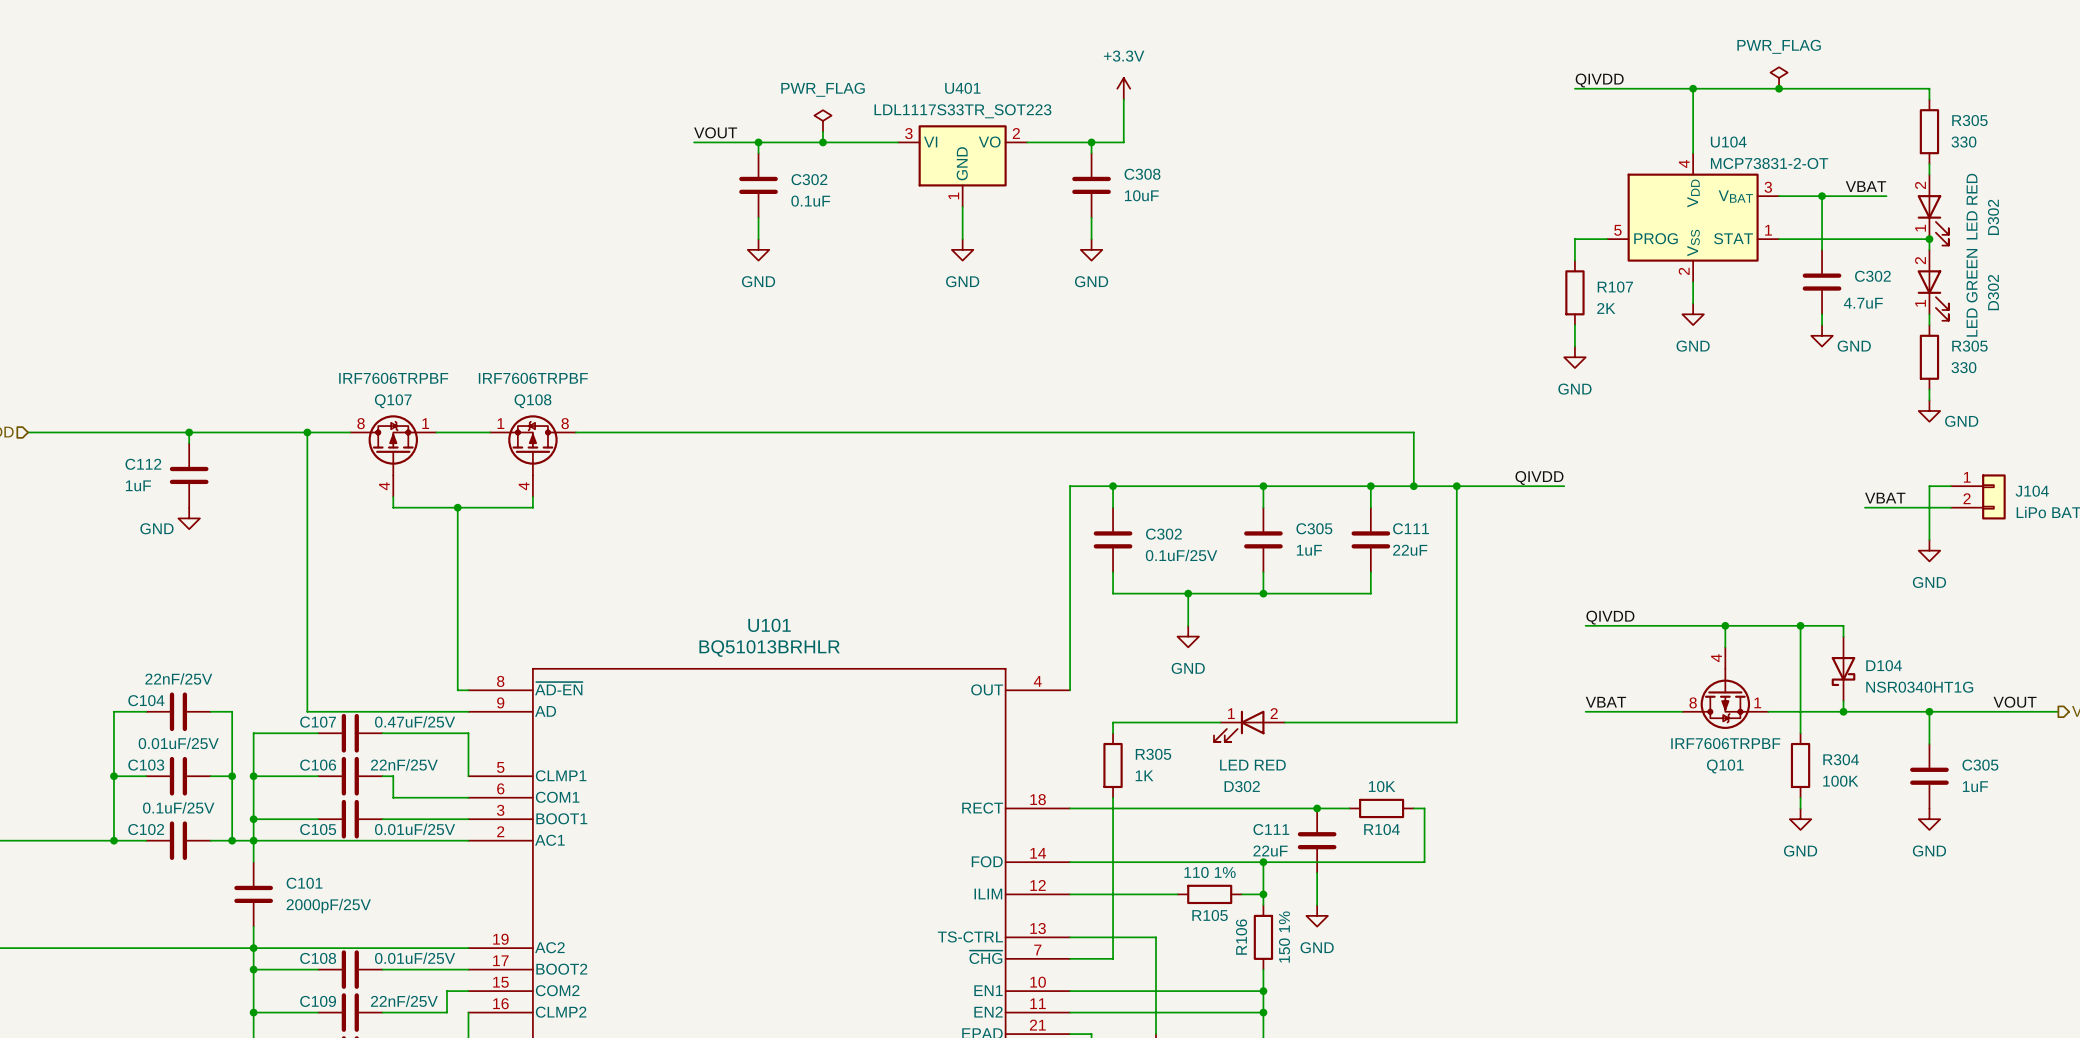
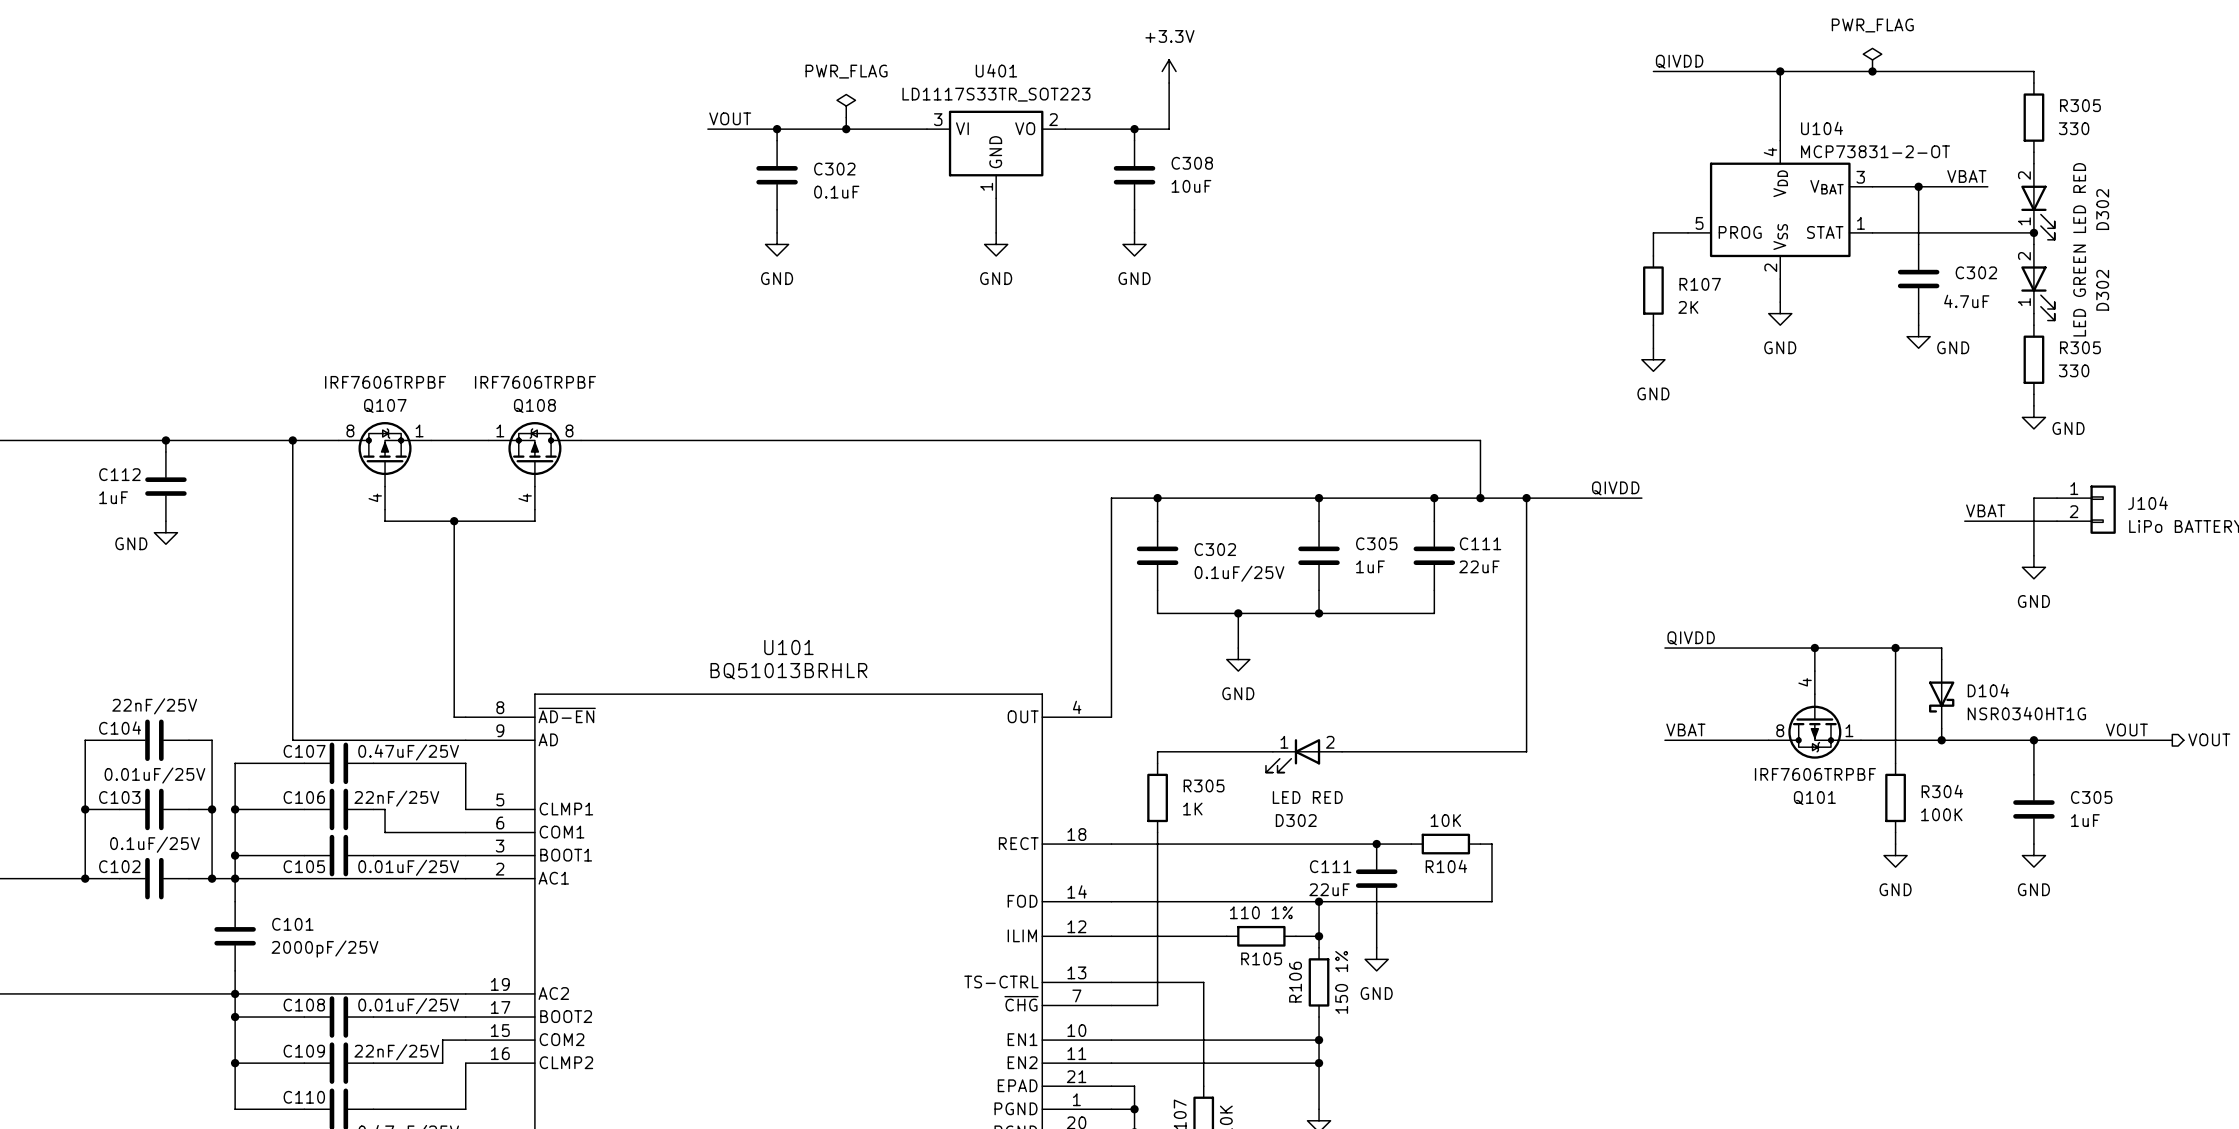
U401 value: LDL1117S33TR_SOT223 (962, 111) -> LD1117S33TR_SOT223 (996, 94)

